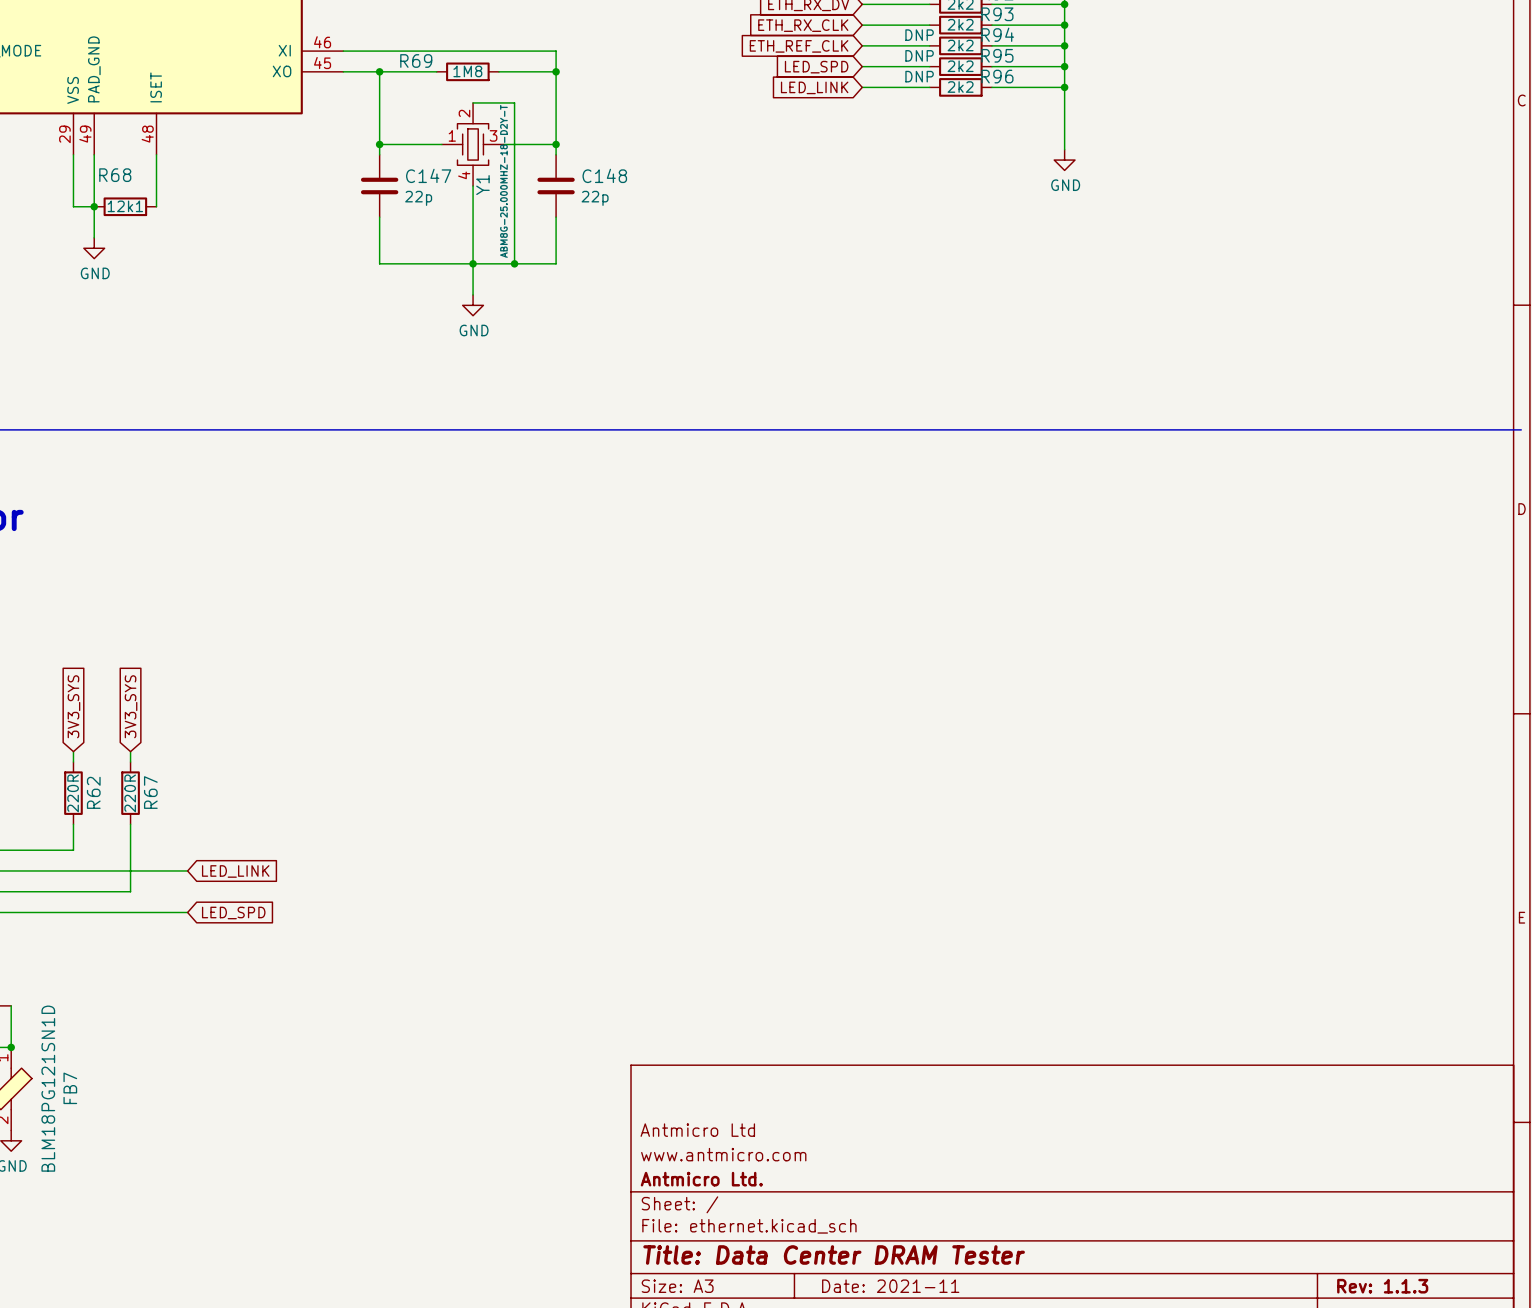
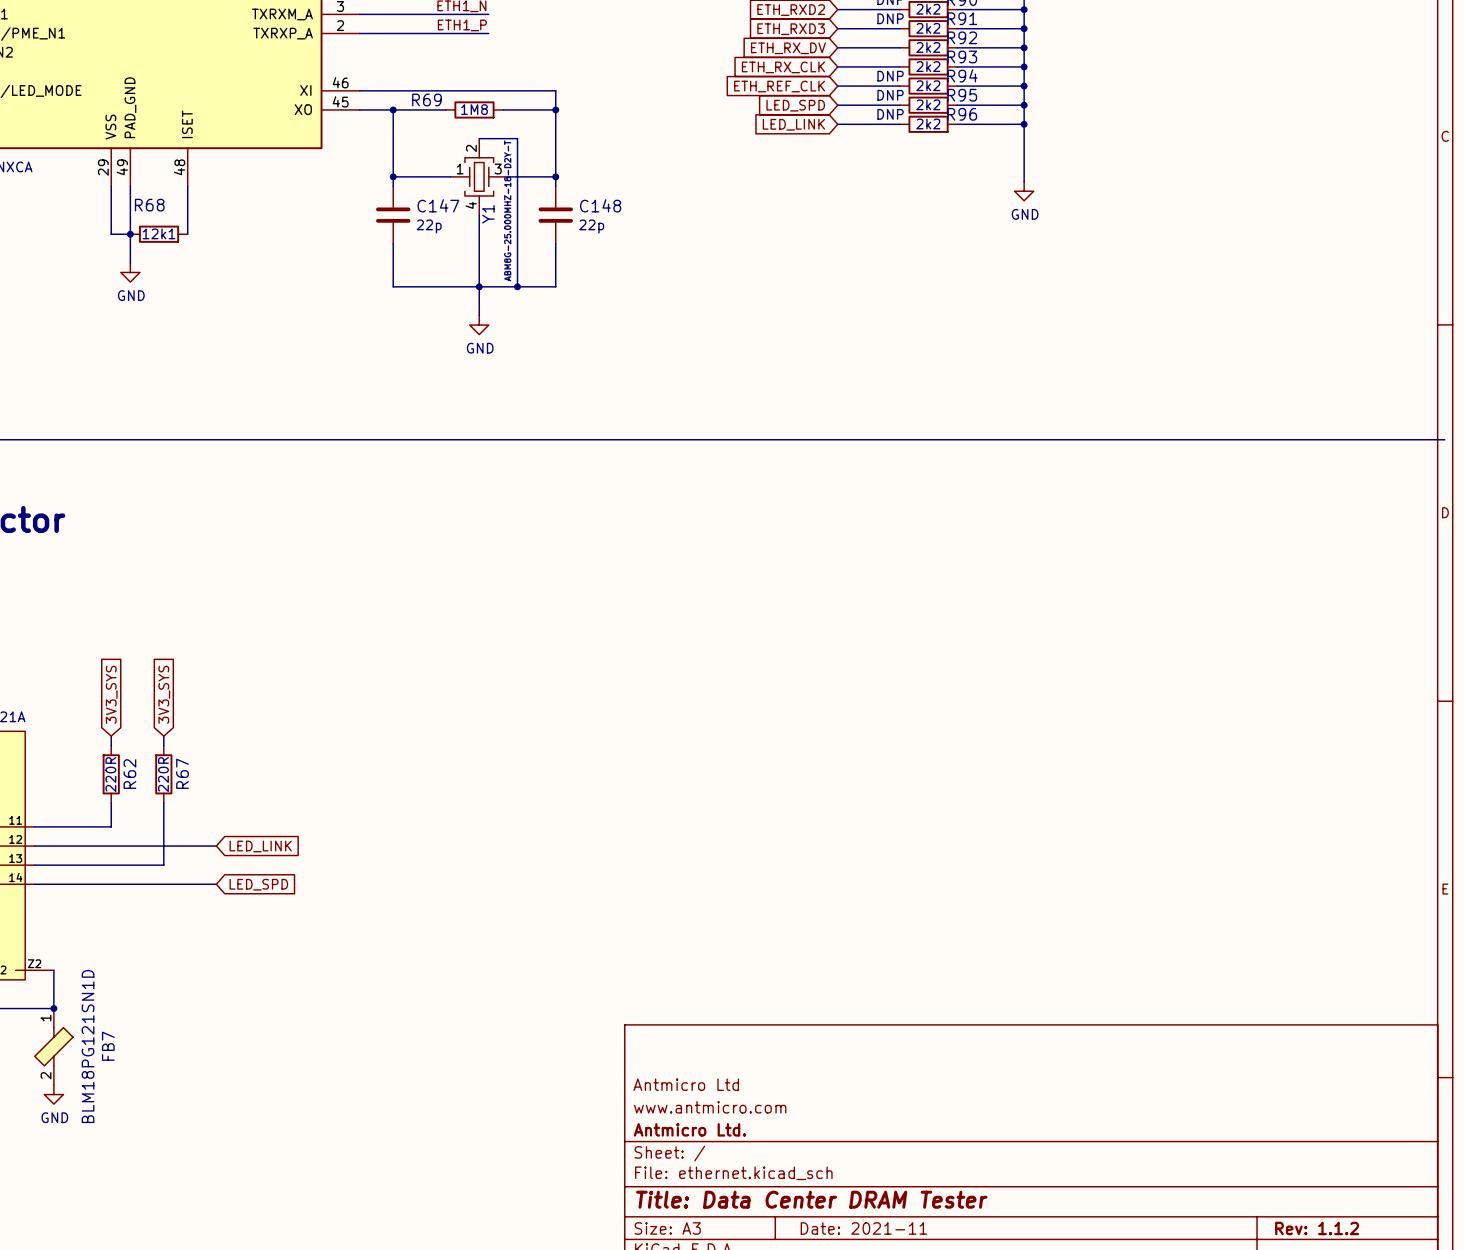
title block: Rev: 1.1.3 (1382, 1286) -> Rev: 1.1.2 (1317, 1228)

